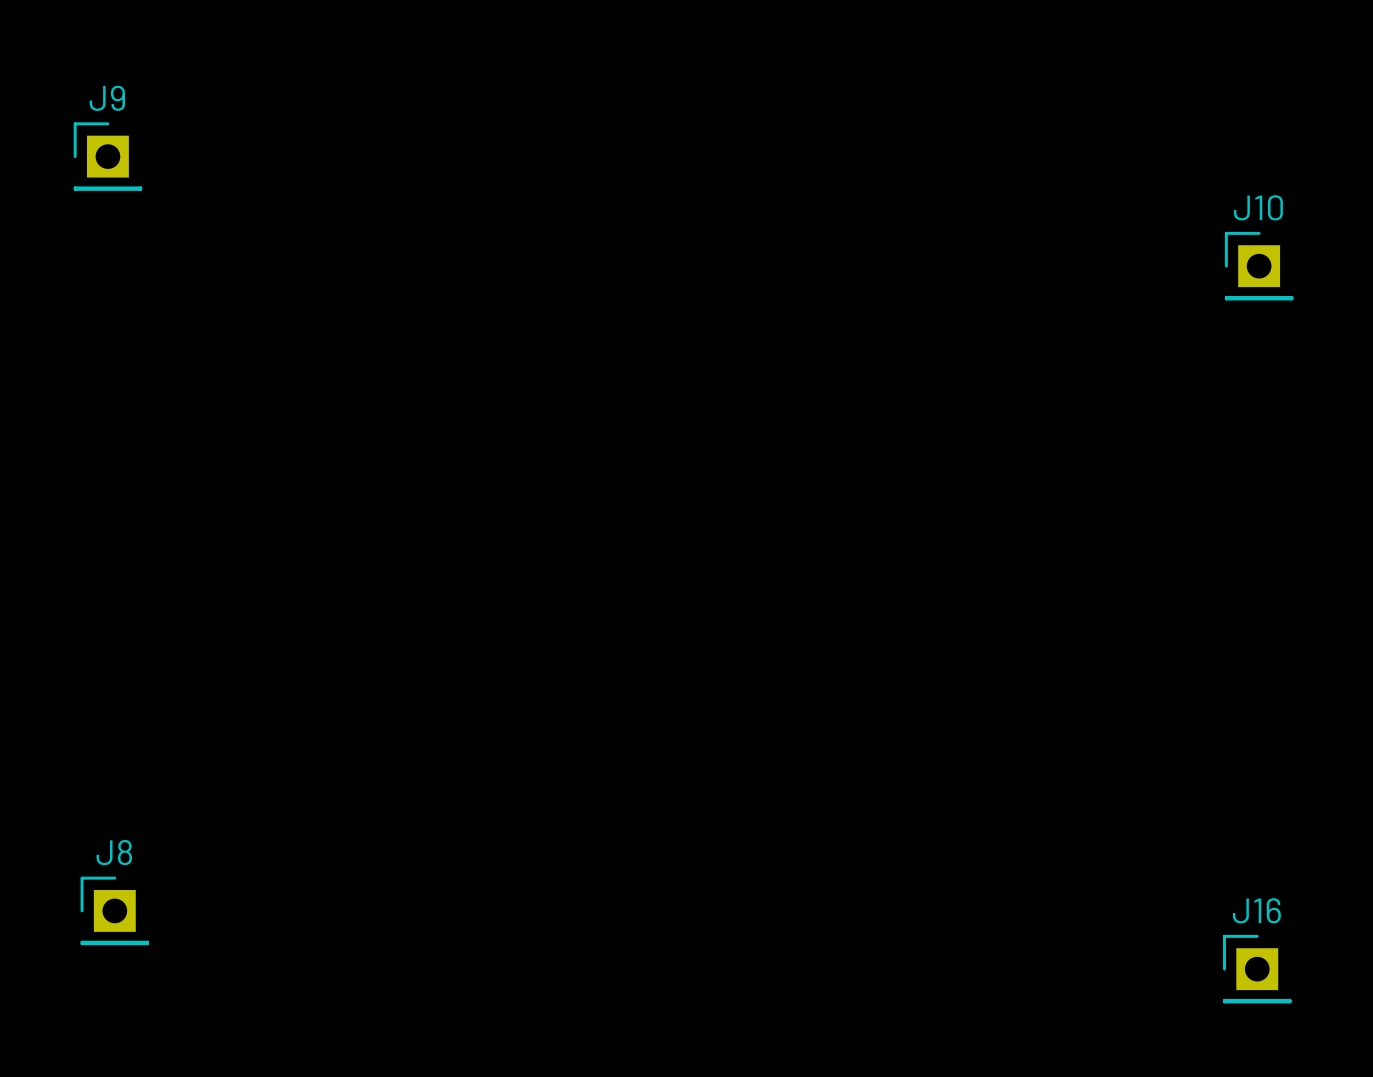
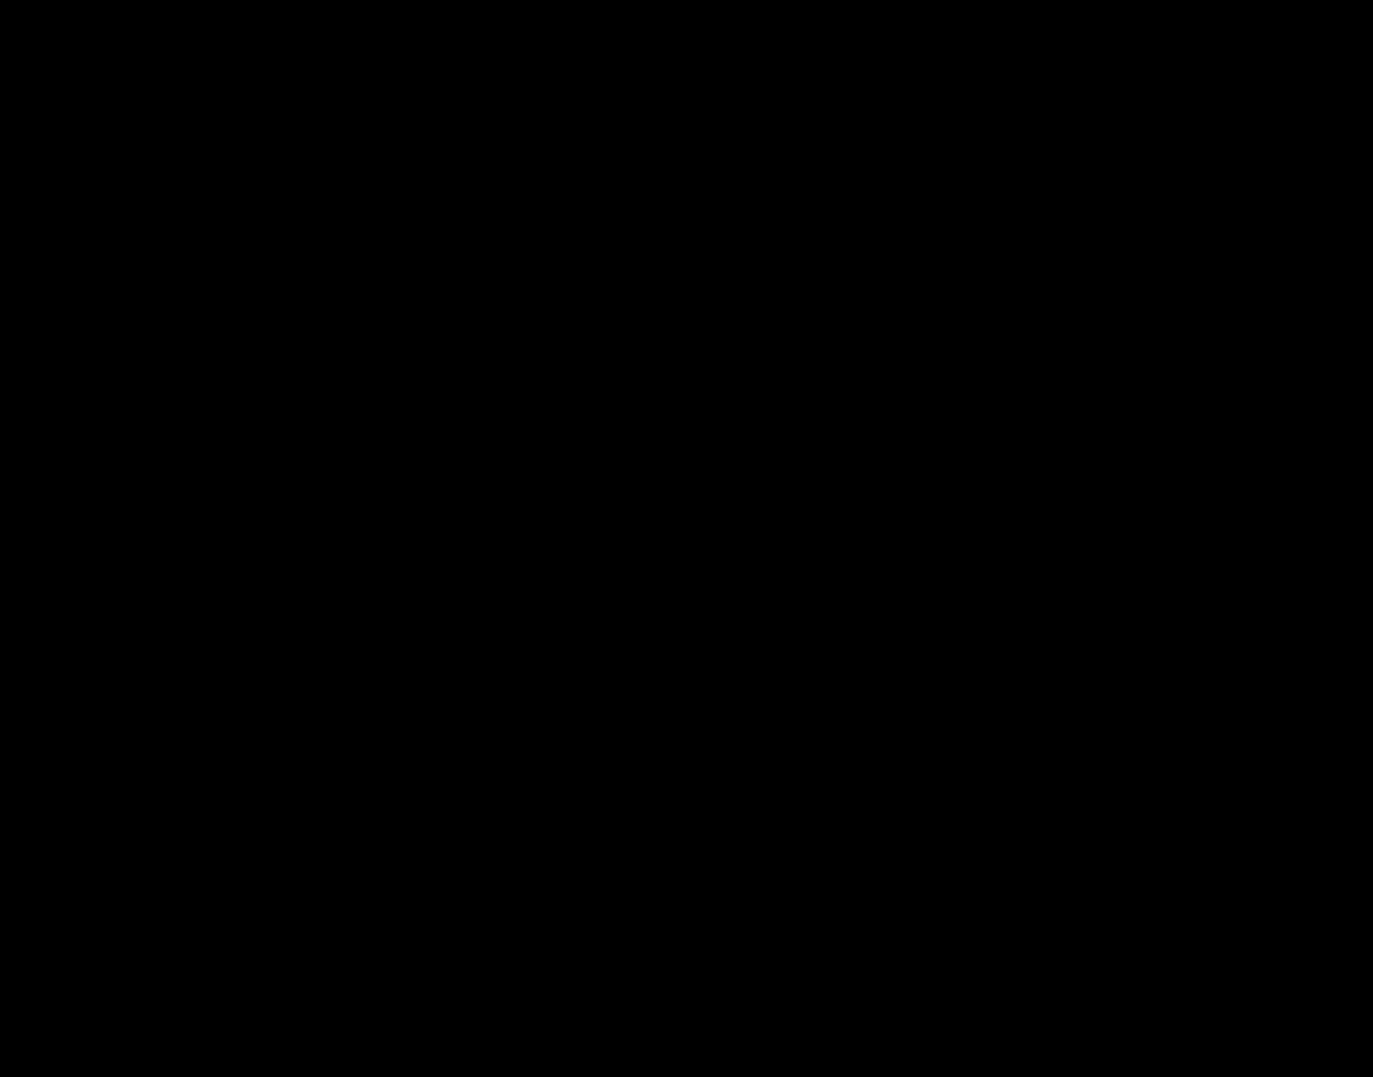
J9: (107, 156) -> none
J10: (1259, 266) -> none
J8: (114, 910) -> none
J16: (1257, 969) -> none

